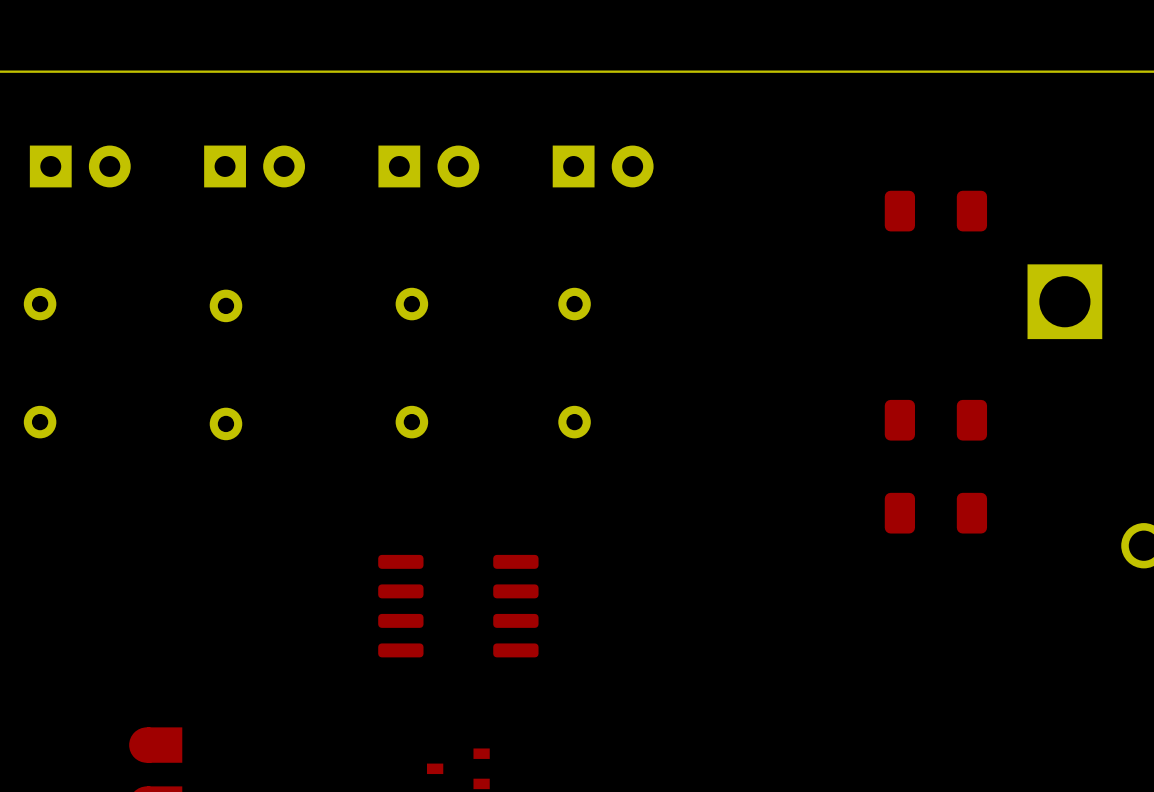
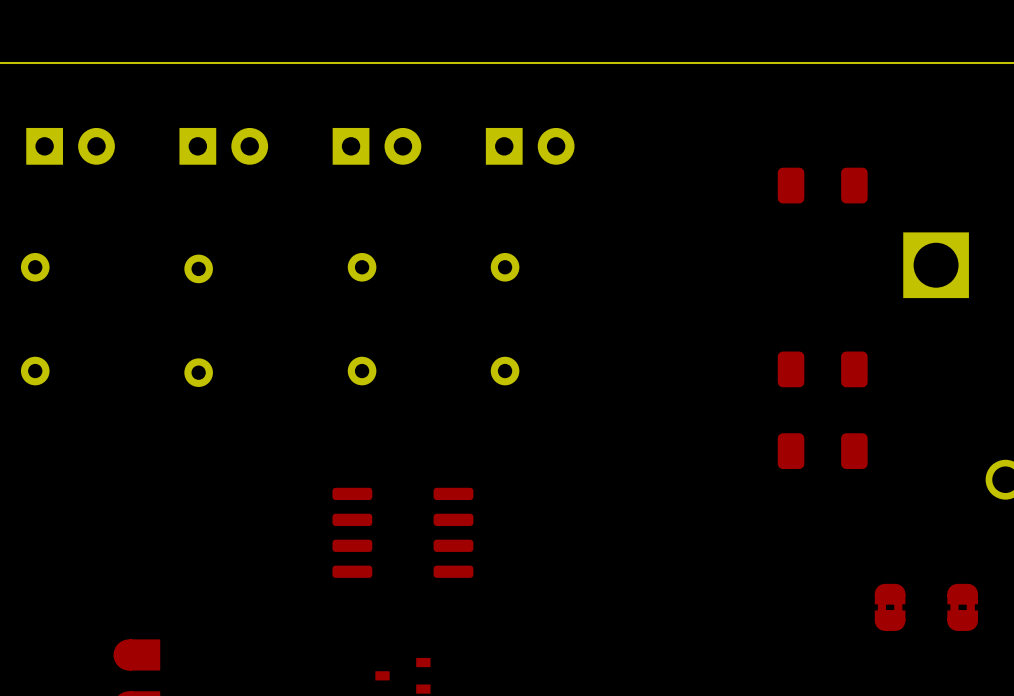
part: none -> (890, 607)
part: none -> (962, 607)

